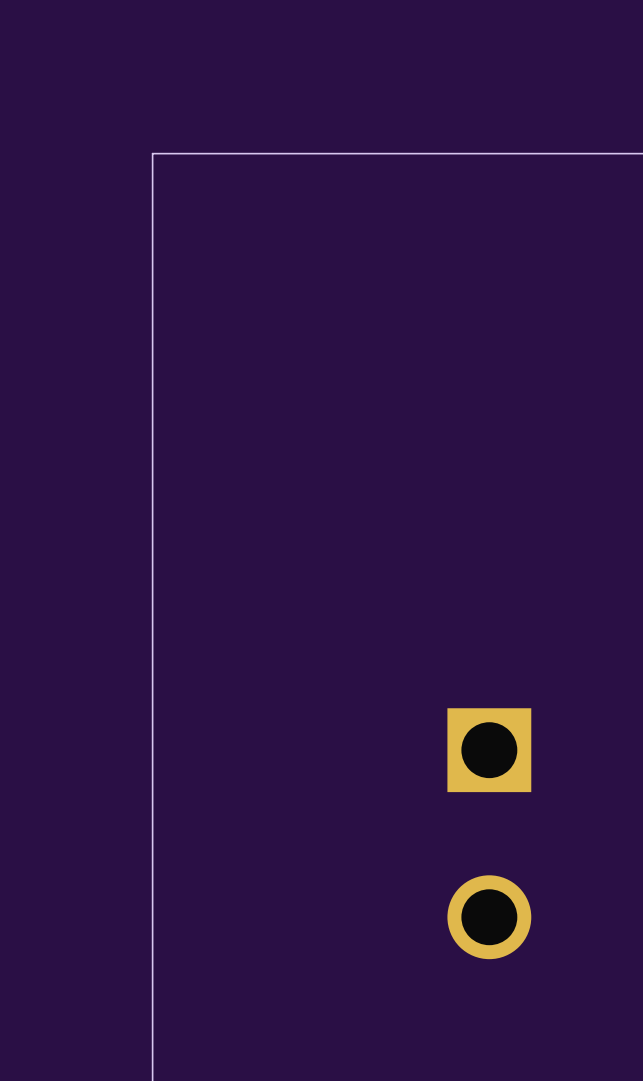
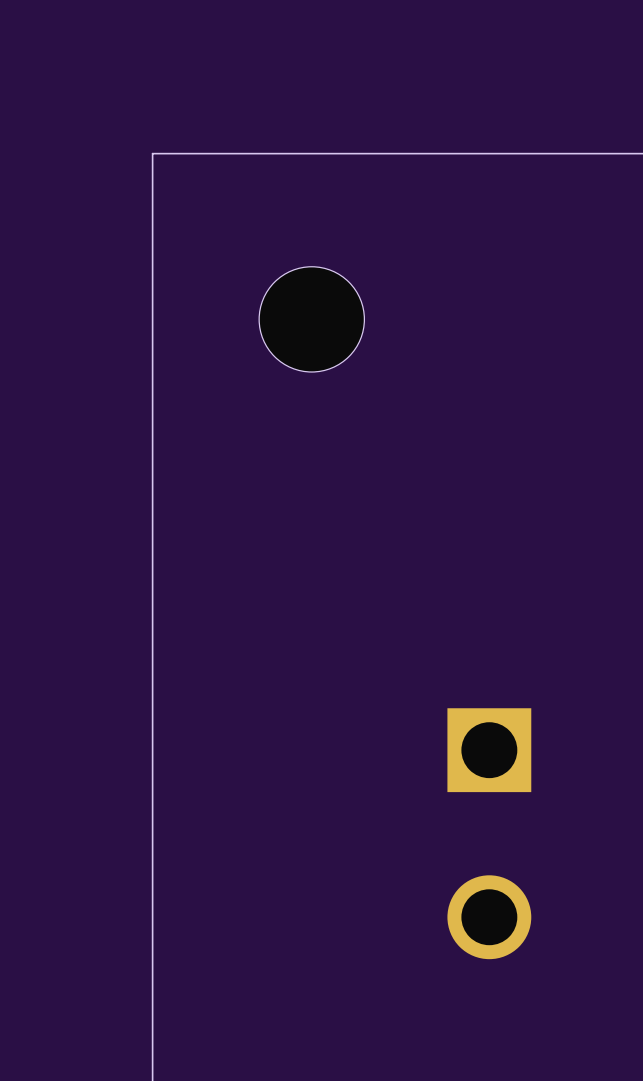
part: none -> (311, 319)

